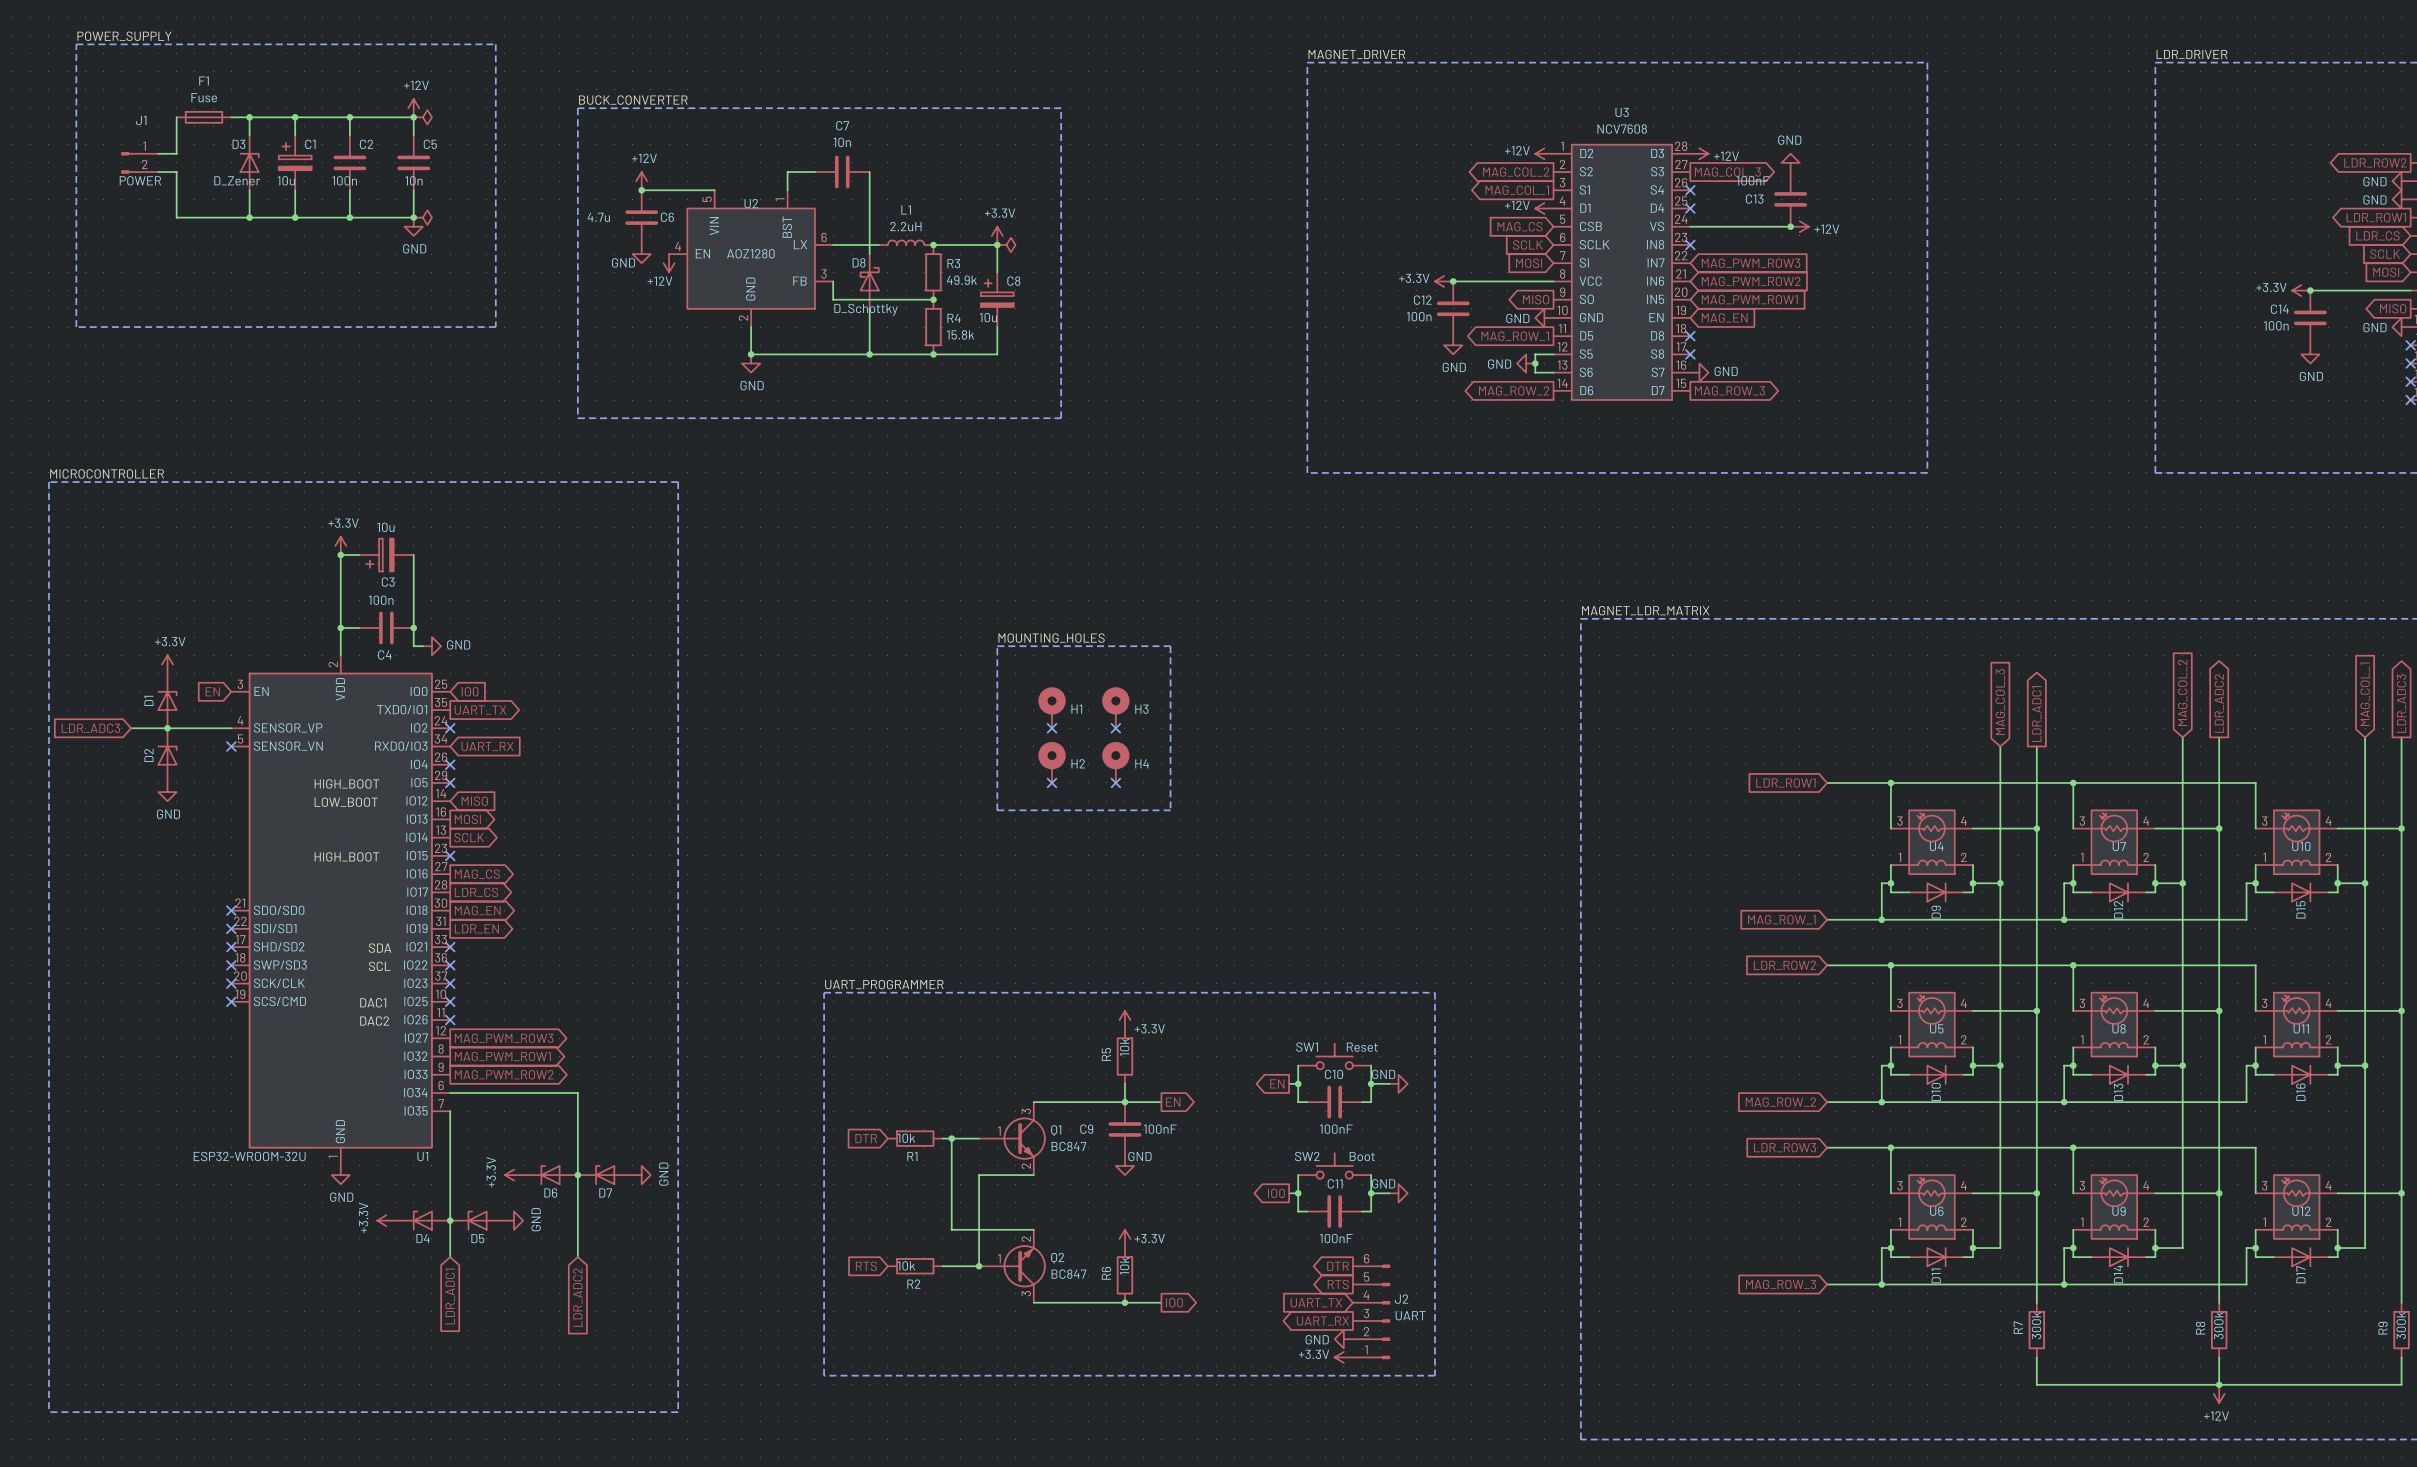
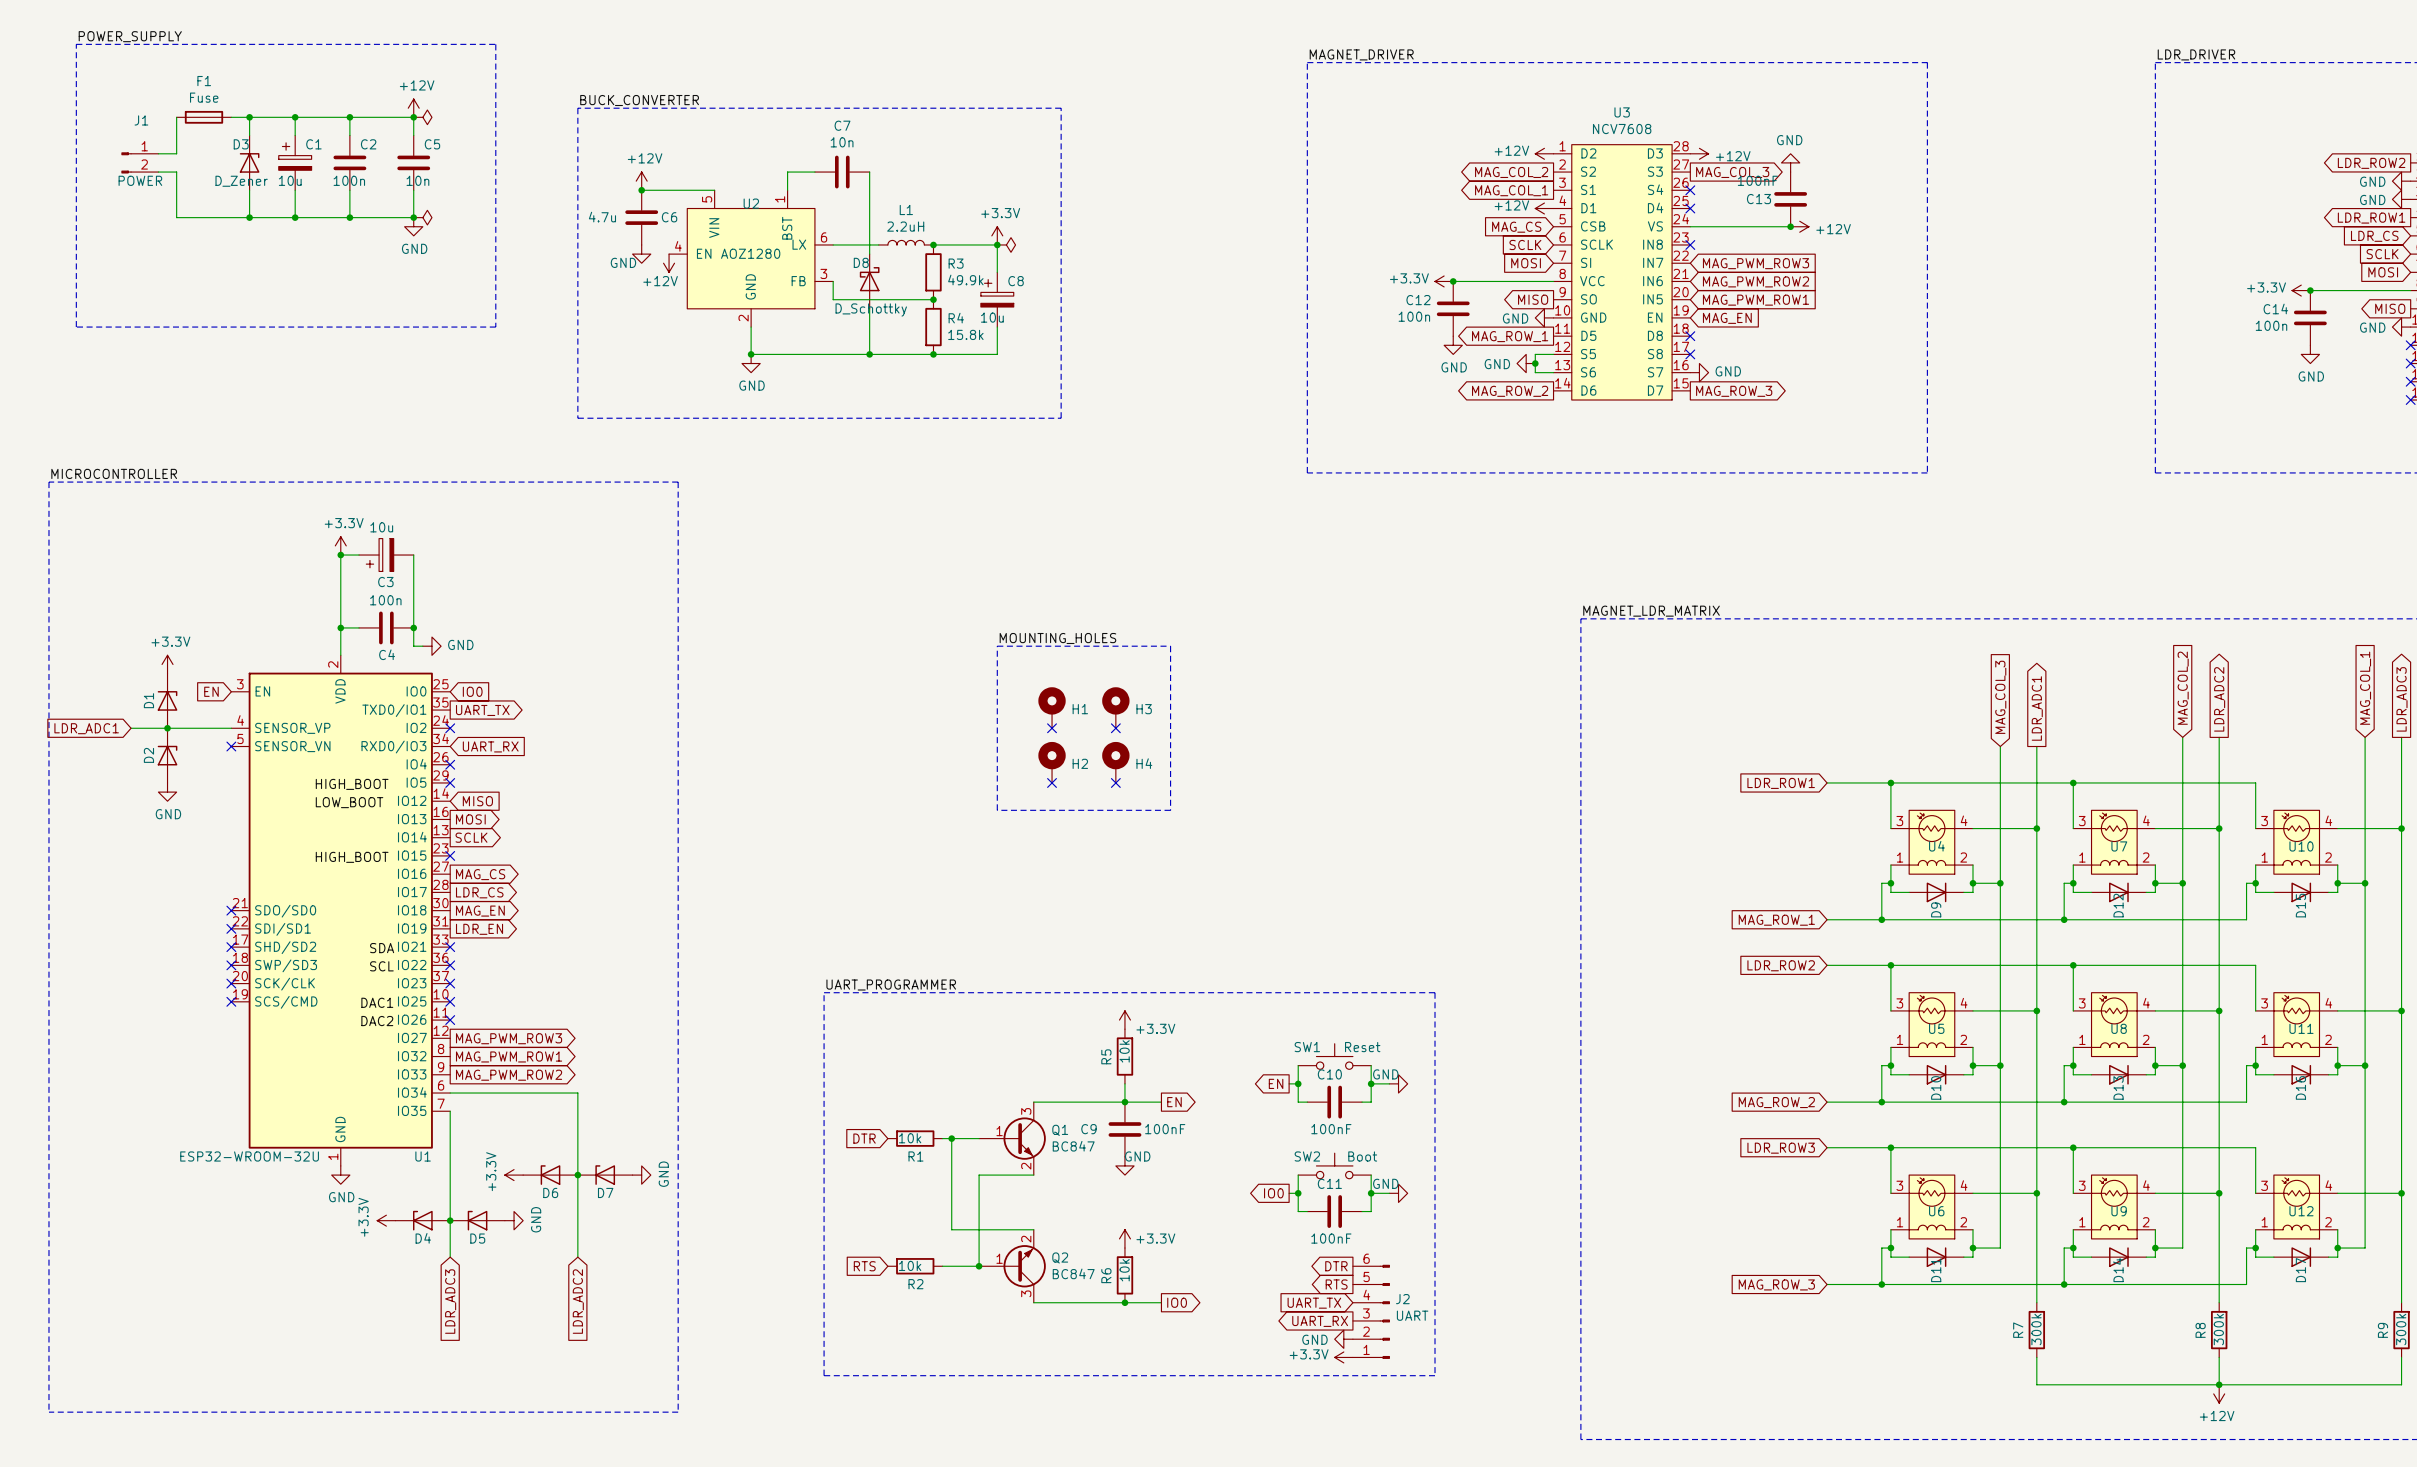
global label: LDR_ADC3 (90, 728) -> LDR_ADC1 (86, 728)
global label: LDR_ADC1 (450, 1296) -> LDR_ADC3 (450, 1301)

